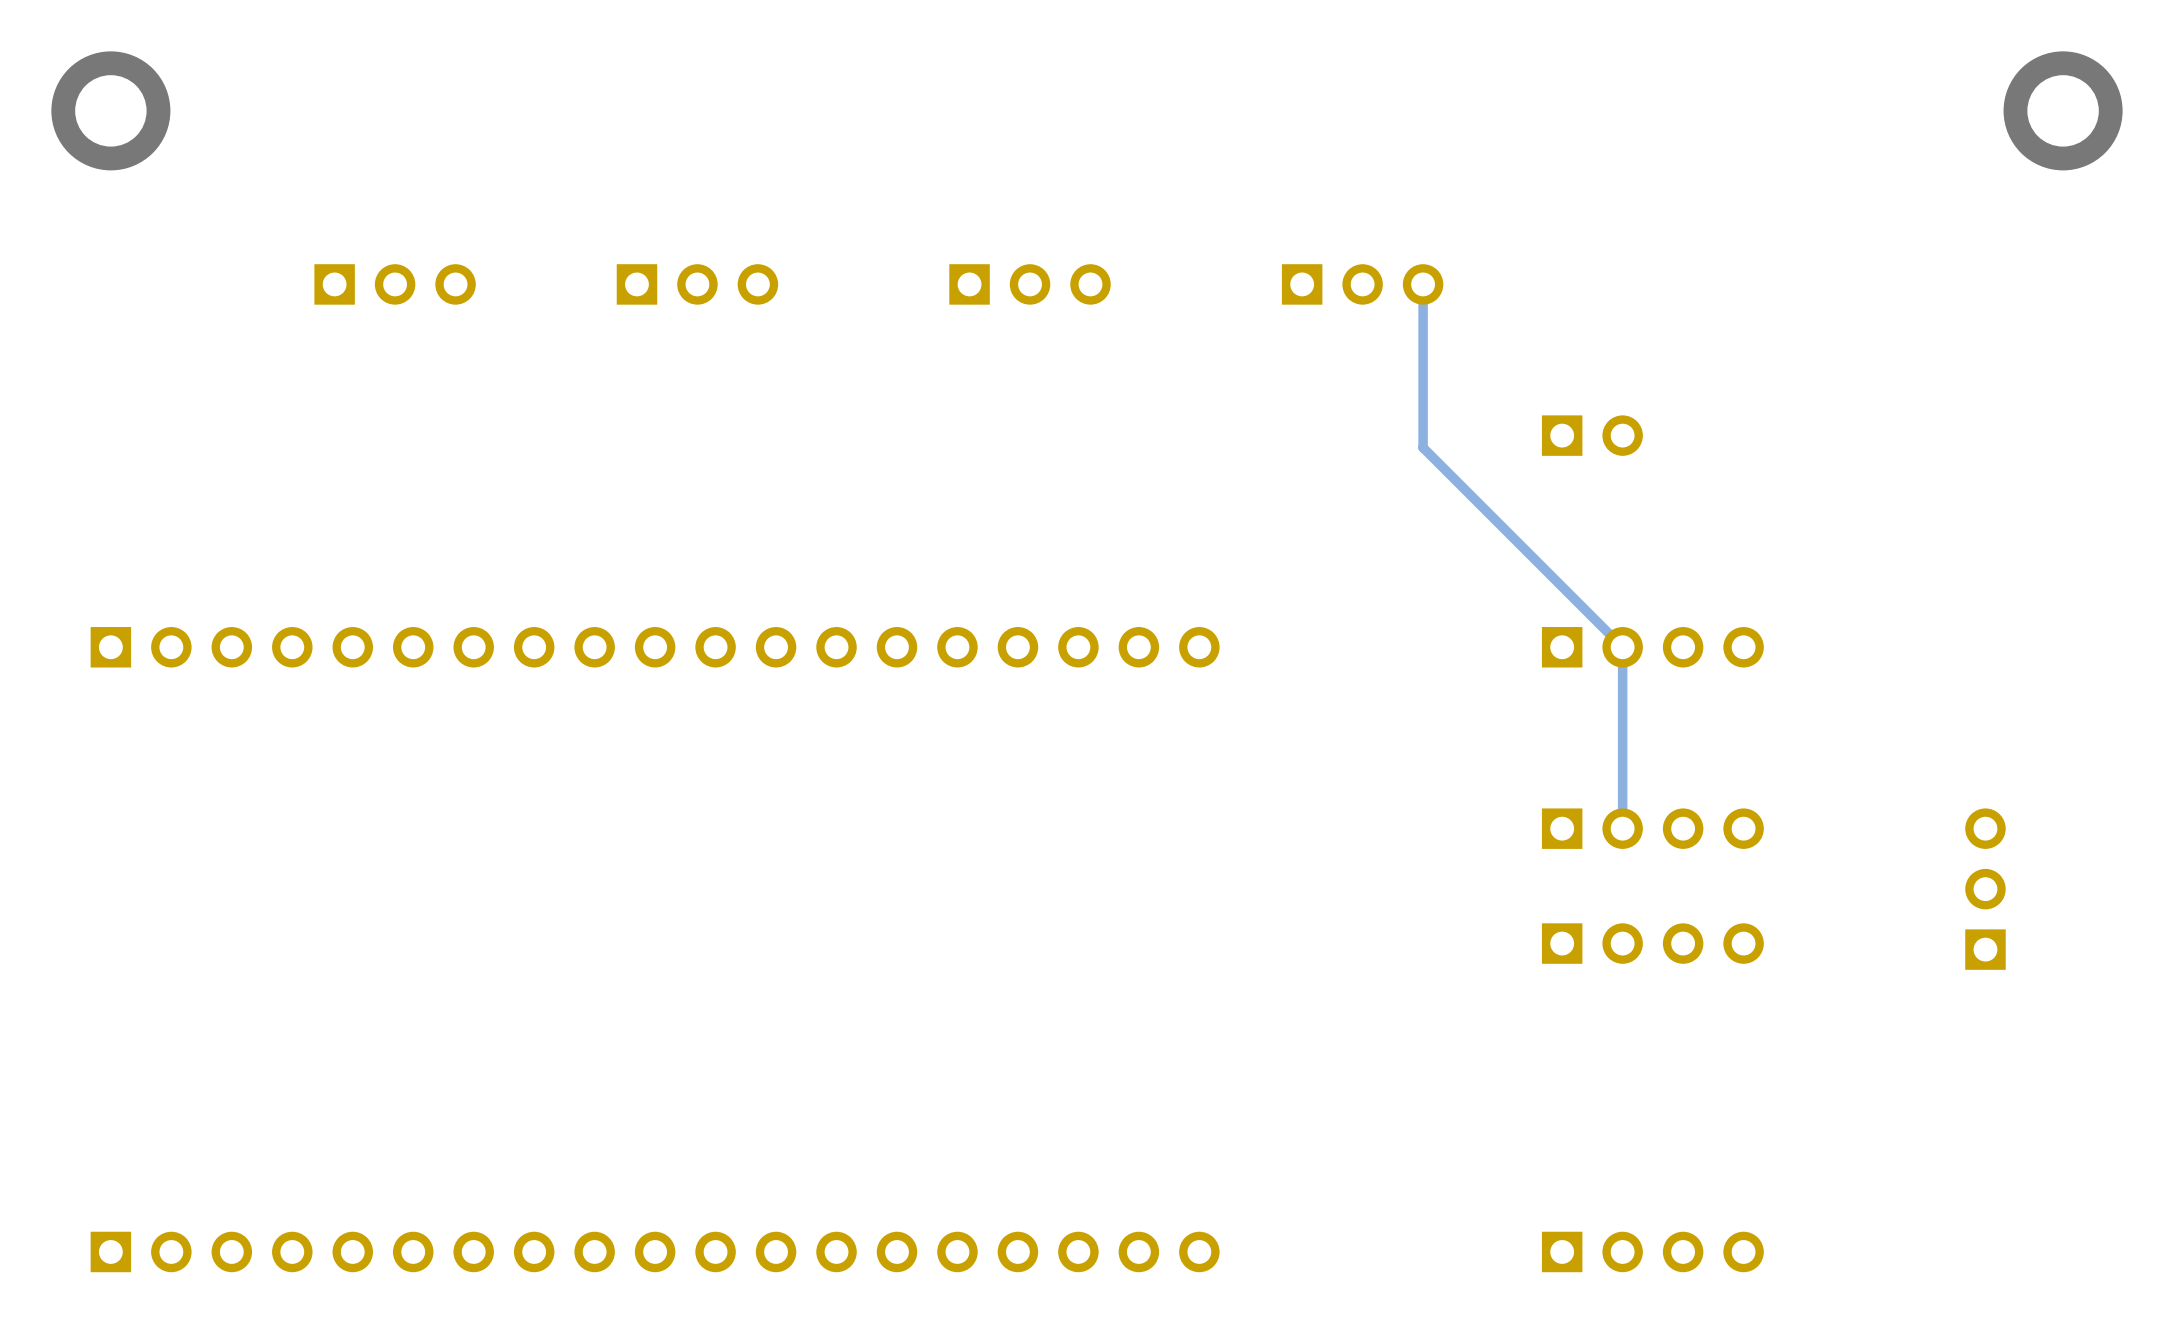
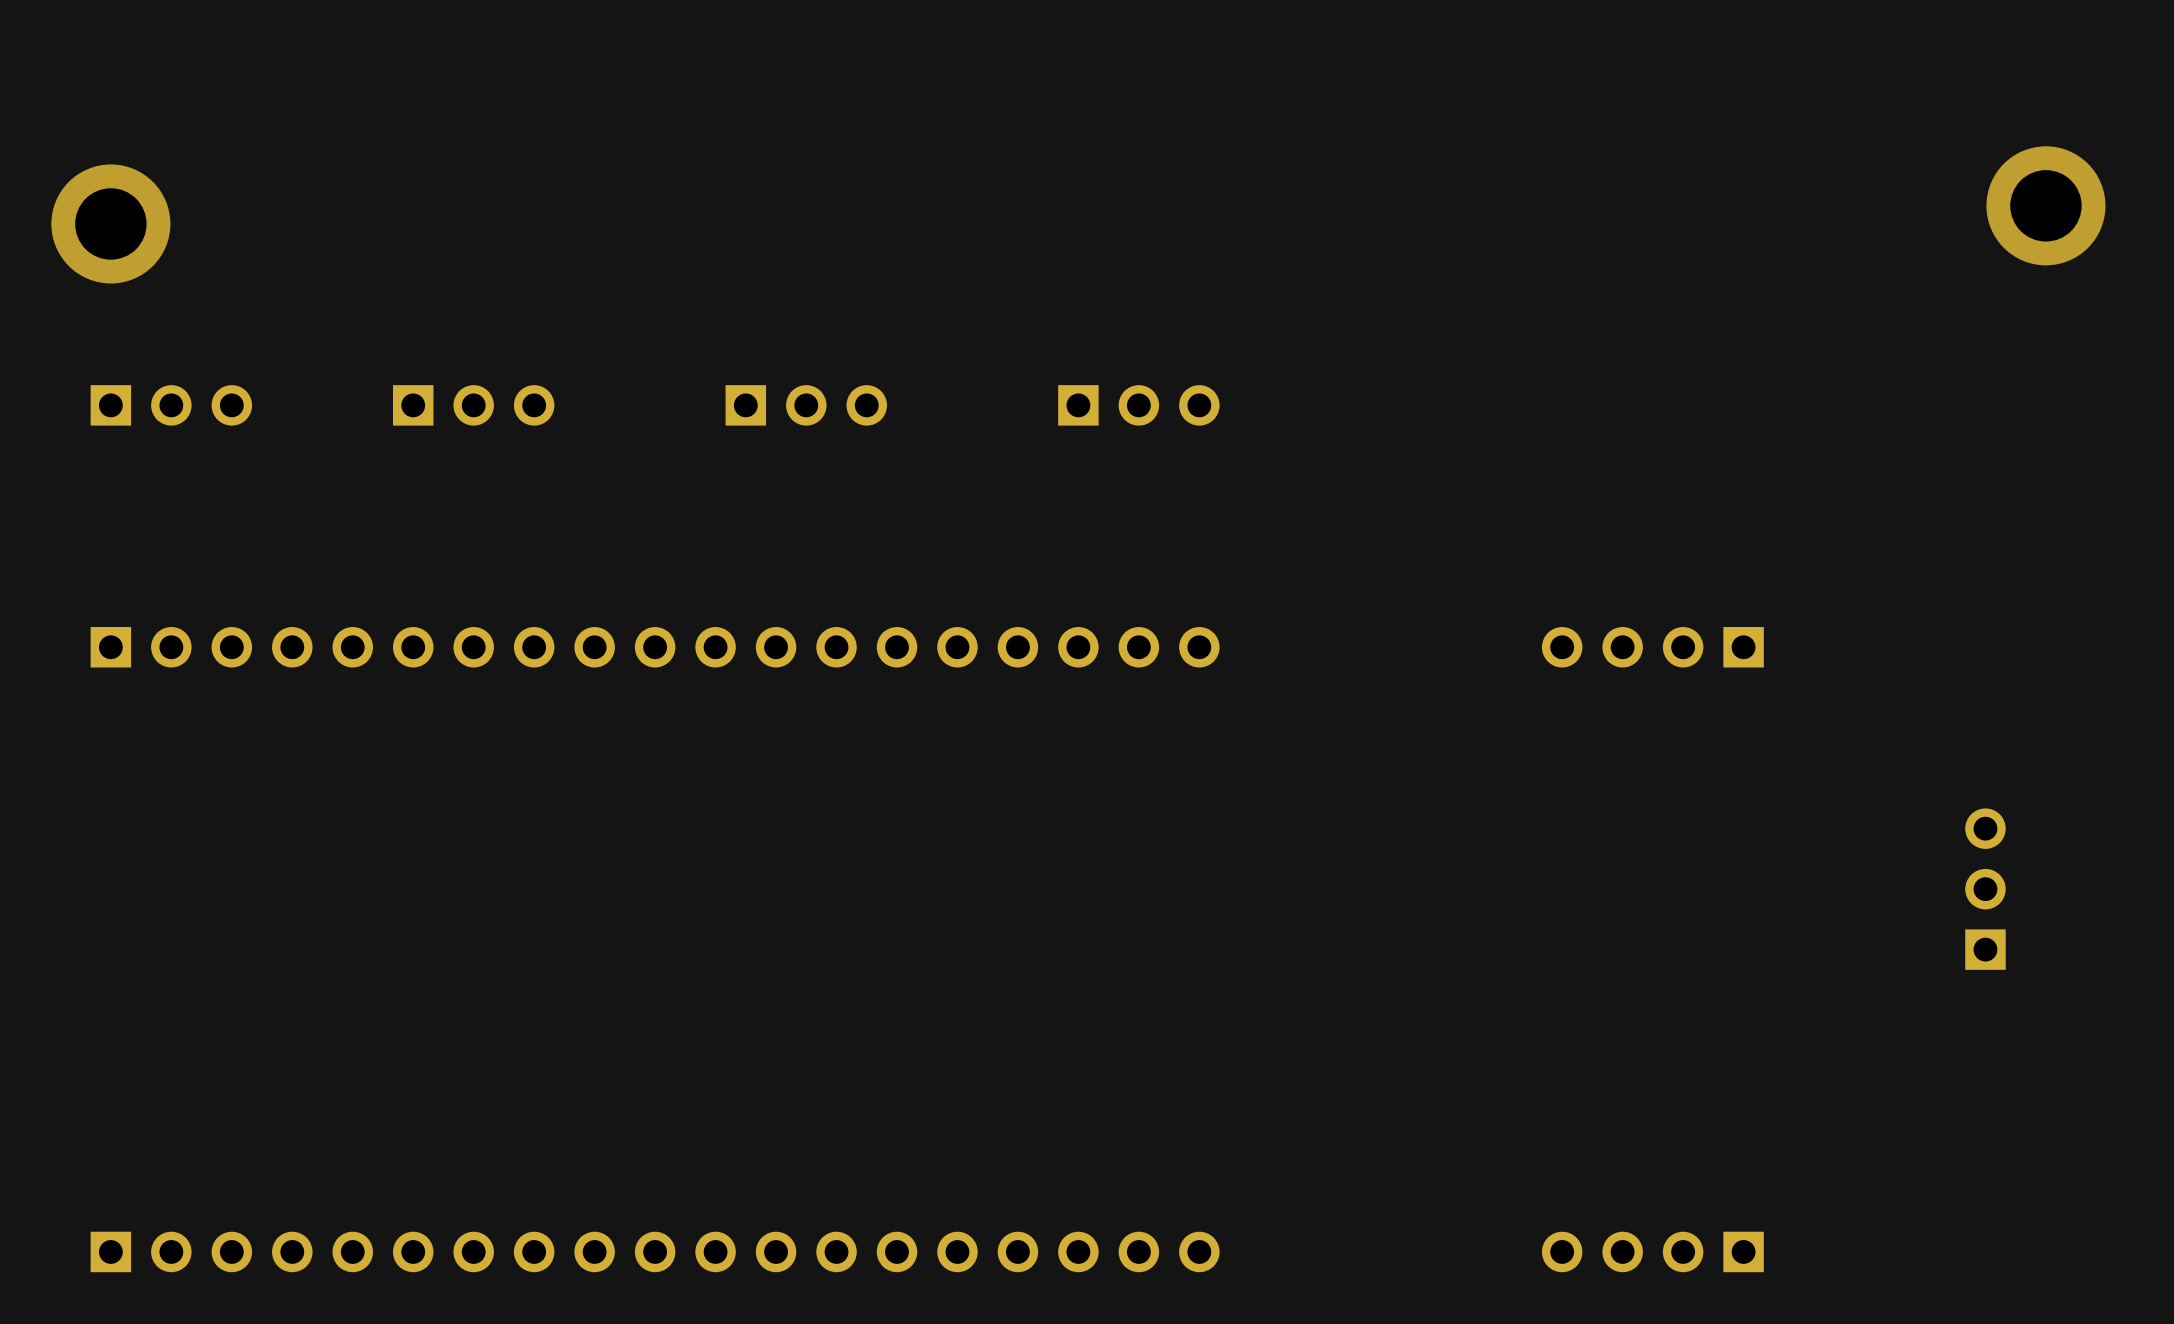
via position: (110, 110) -> (110, 223)
via position: (2063, 110) -> (2045, 205)
part: (395, 284) -> none
part: (697, 284) -> none
part: (1030, 284) -> none
part: (1362, 284) -> none
track: (1423, 284) (1423, 447) (1622, 647) (1622, 828) -> none
part: none -> (171, 405)
part: none -> (473, 405)
part: none -> (806, 405)
part: none -> (1138, 405)
part: (1592, 435) -> none
part rotation: 0° (1652, 647) -> 180° (1652, 647)
part: (1652, 828) -> none
part: (1652, 943) -> none
part rotation: 0° (1652, 1251) -> 180° (1652, 1251)

